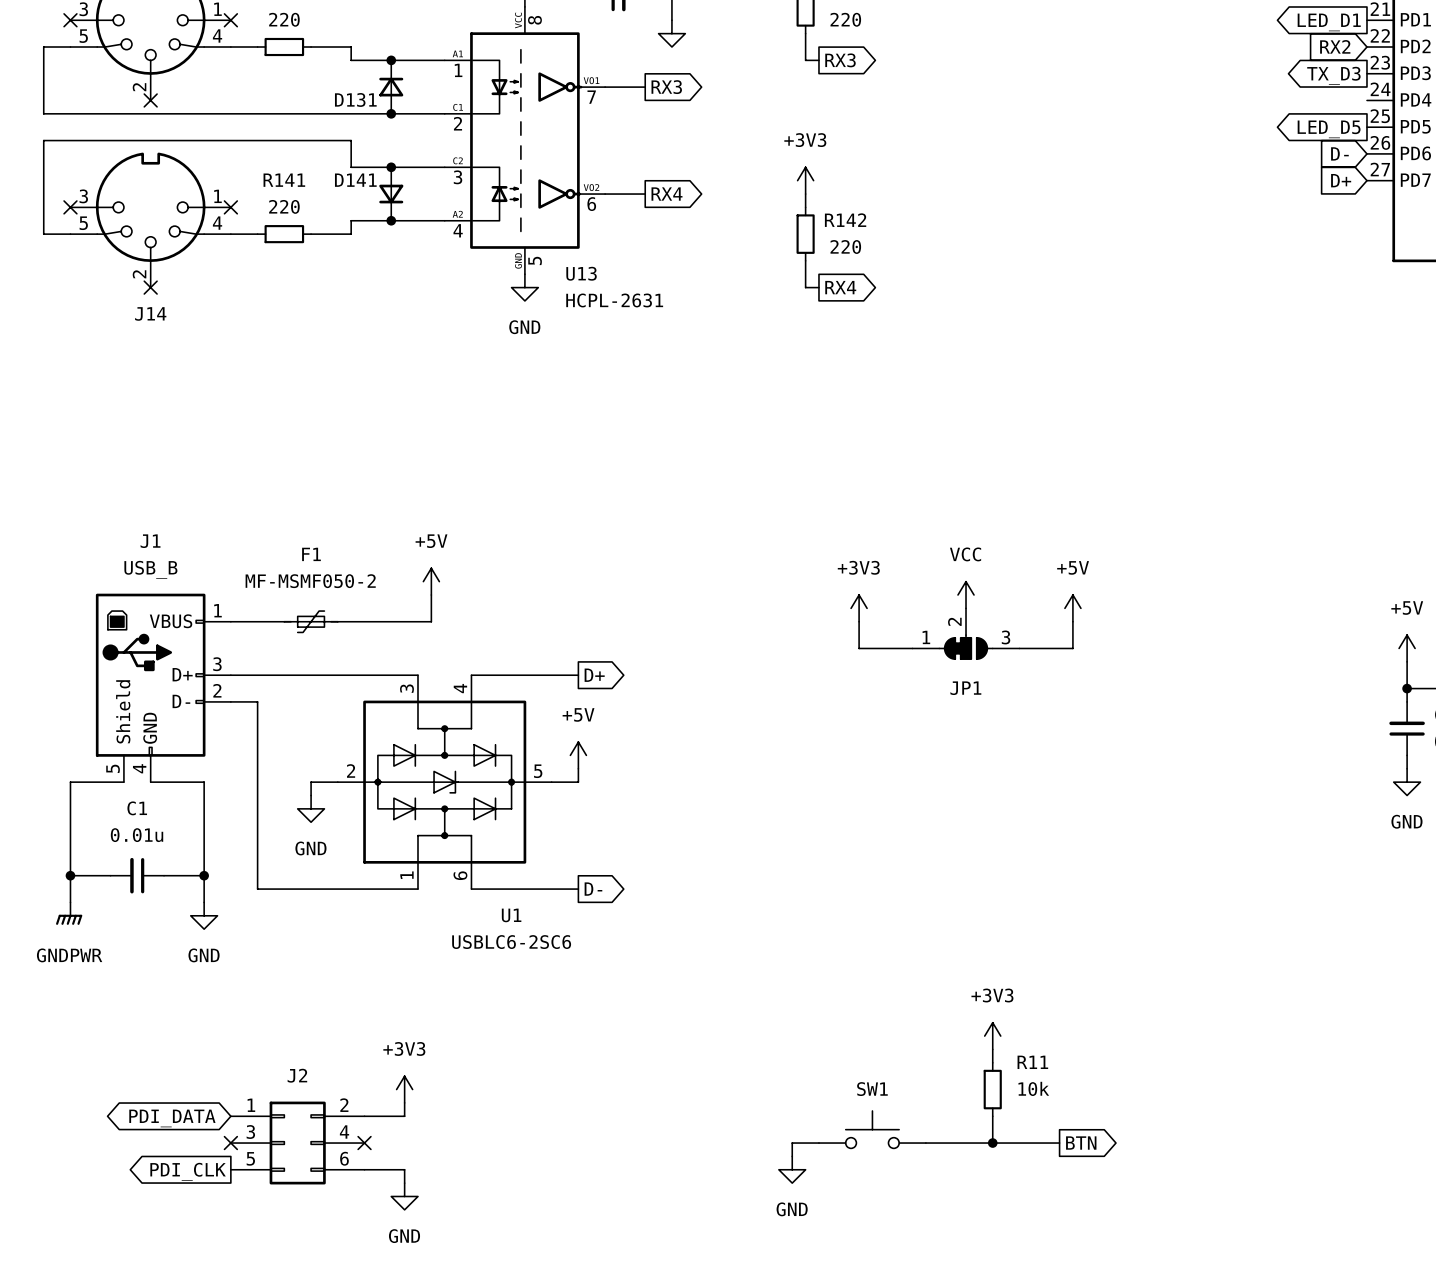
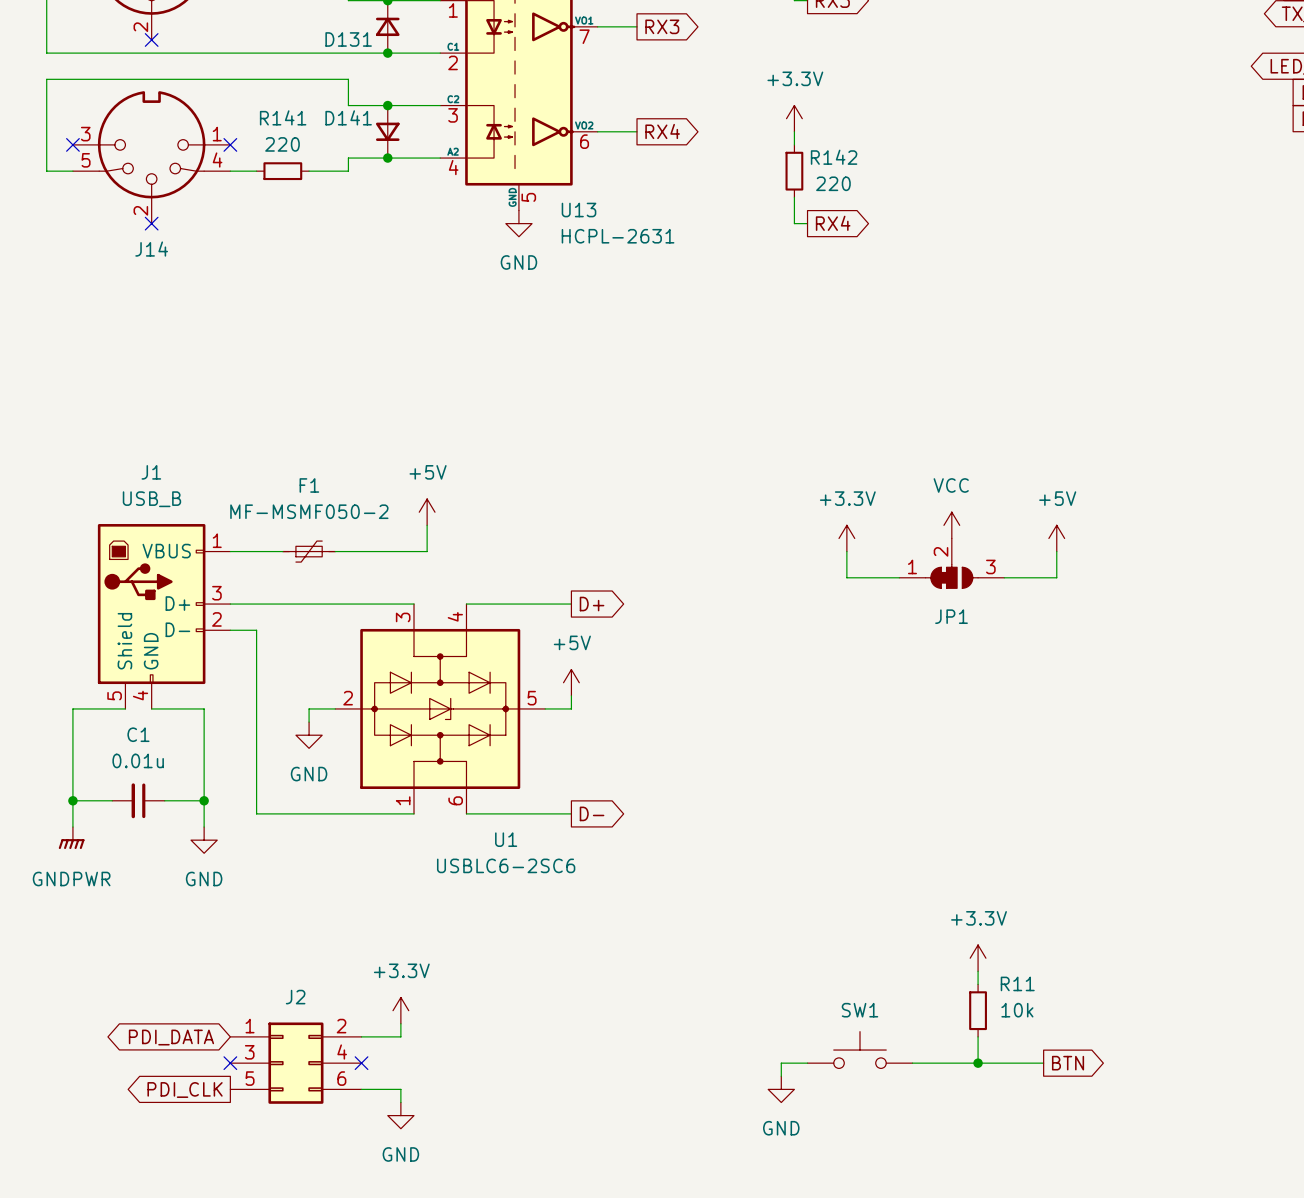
power symbol: +3V3 (805, 180) -> +3.3V (794, 118)
power symbol: +3V3 (859, 608) -> +3.3V (846, 538)
power symbol: +3V3 (992, 1036) -> +3.3V (978, 958)
power symbol: +3V3 (404, 1089) -> +3.3V (400, 1010)

